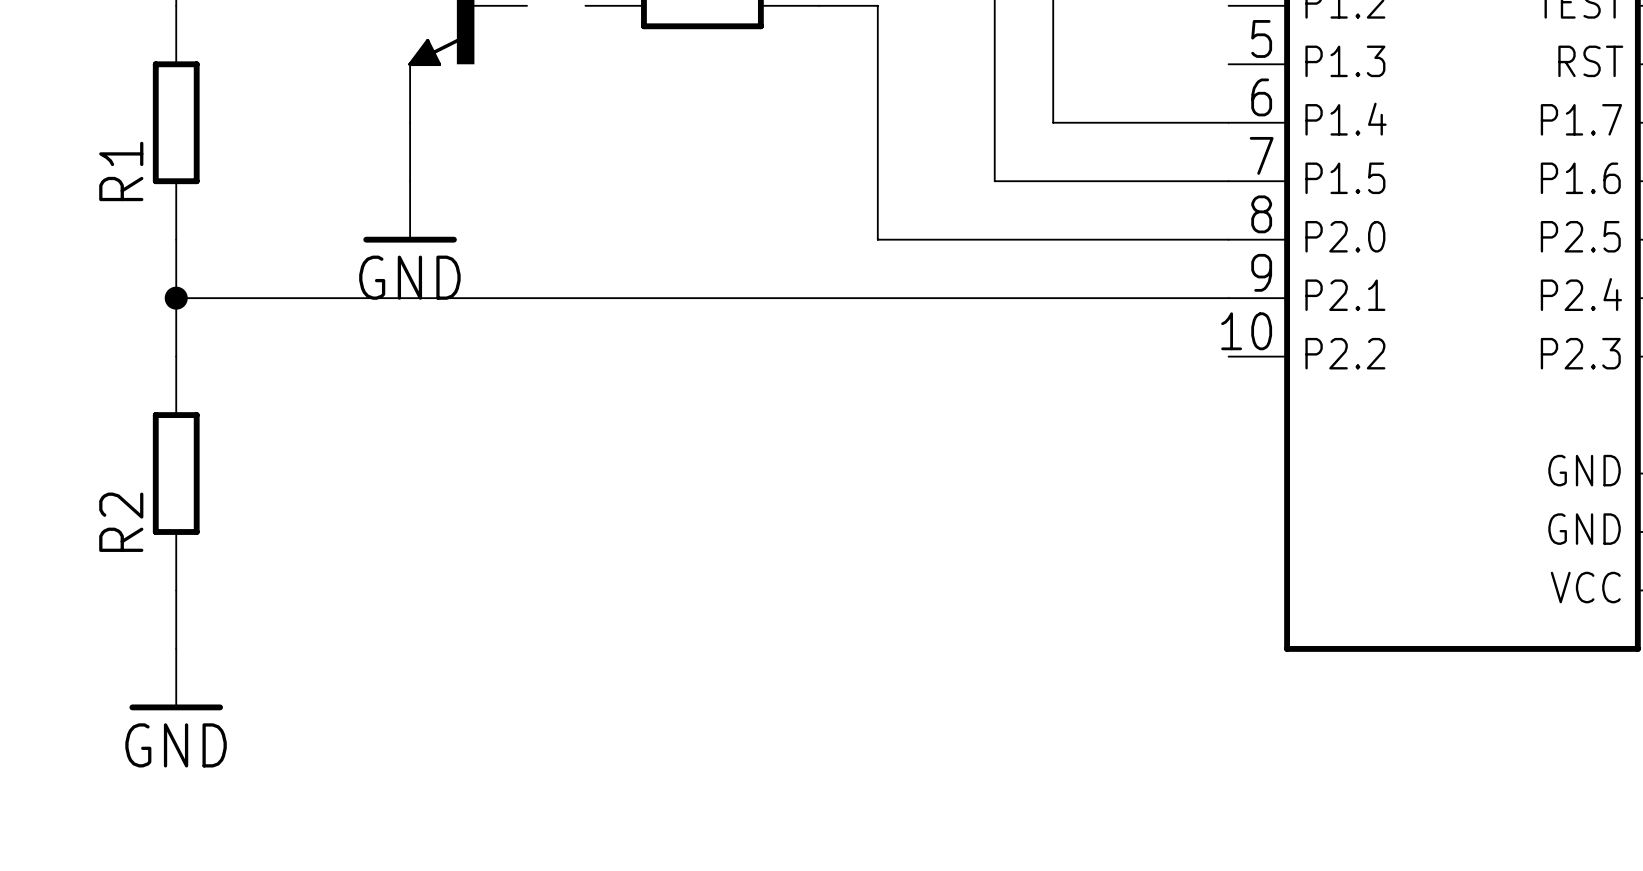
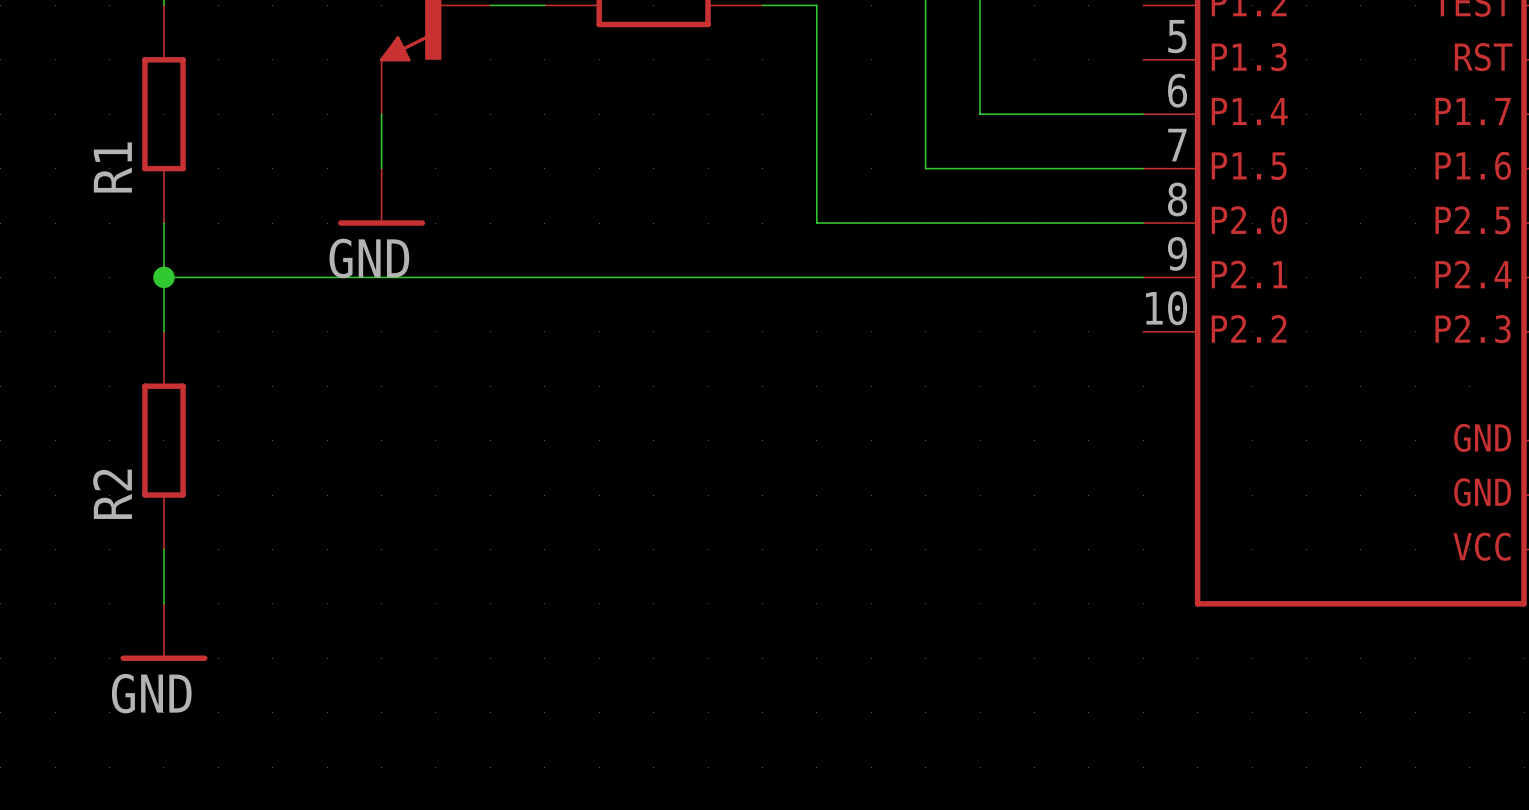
wire: none -> (490, 5) (544, 5)

